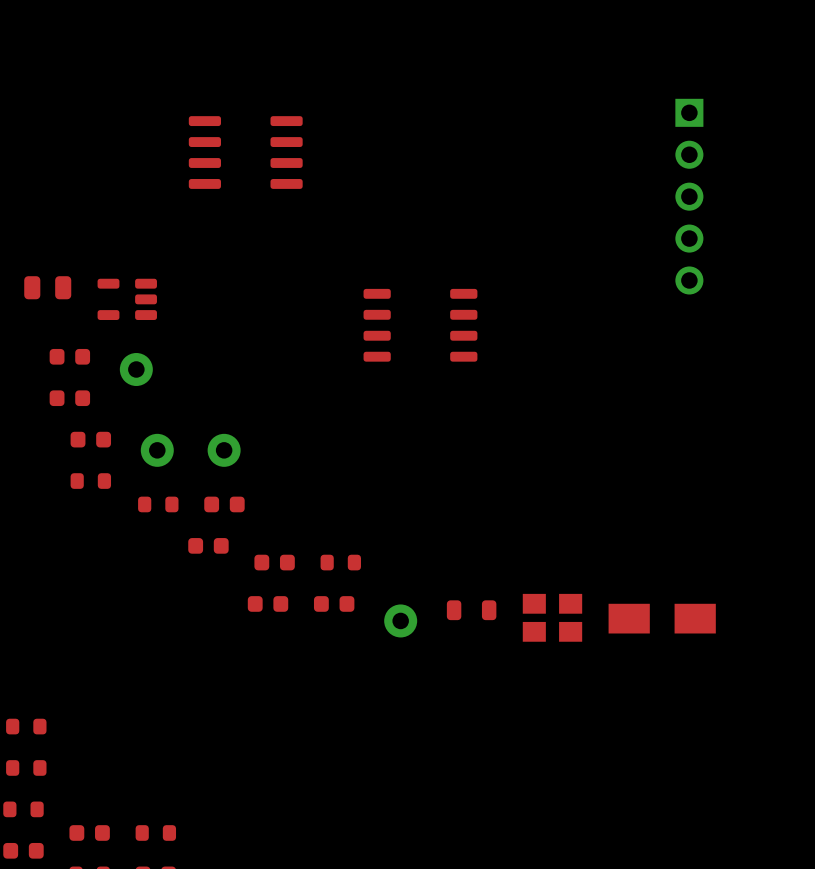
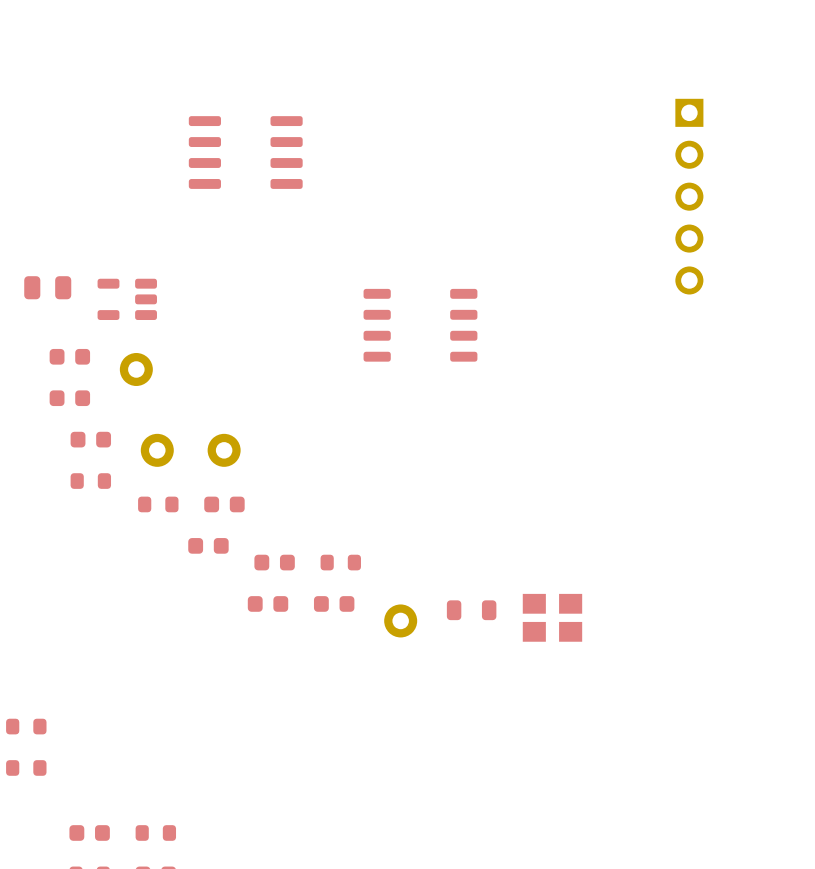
part: (662, 618) -> none
part: (23, 809) -> none
part: (23, 850) -> none

